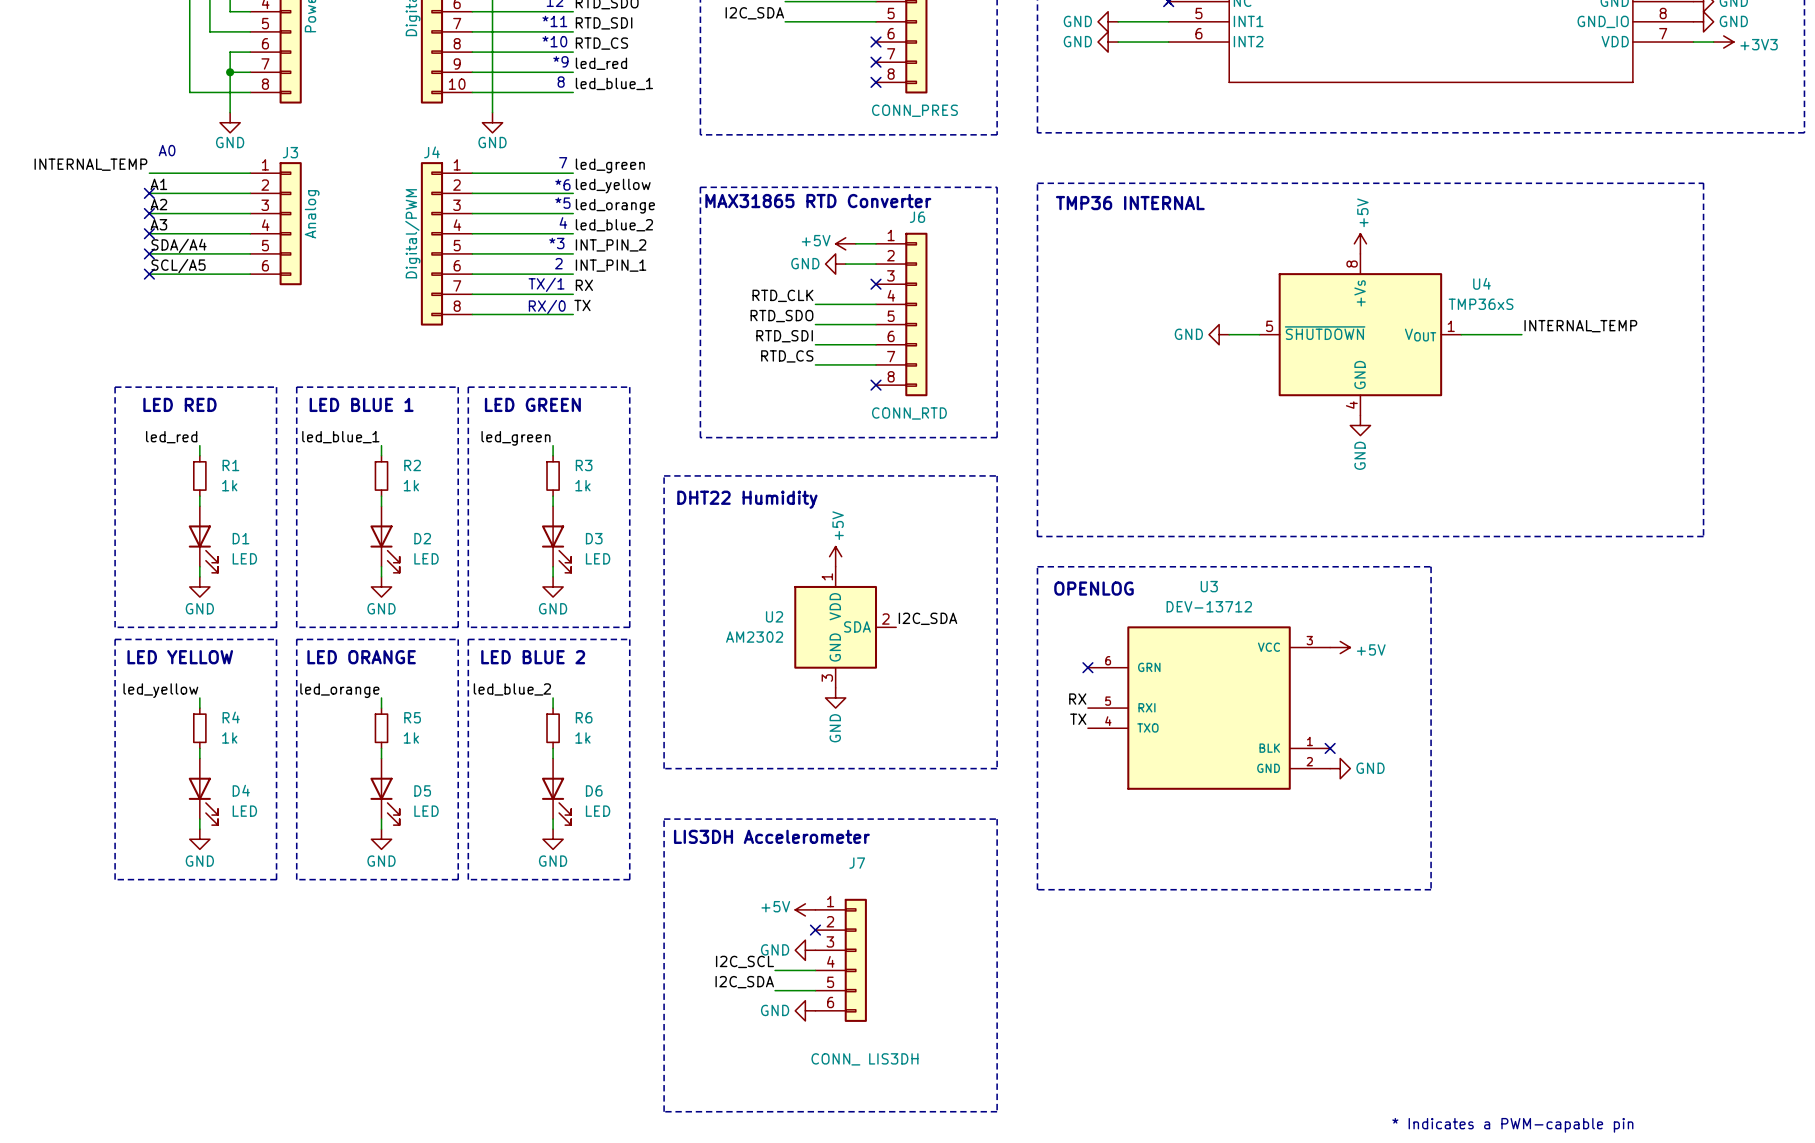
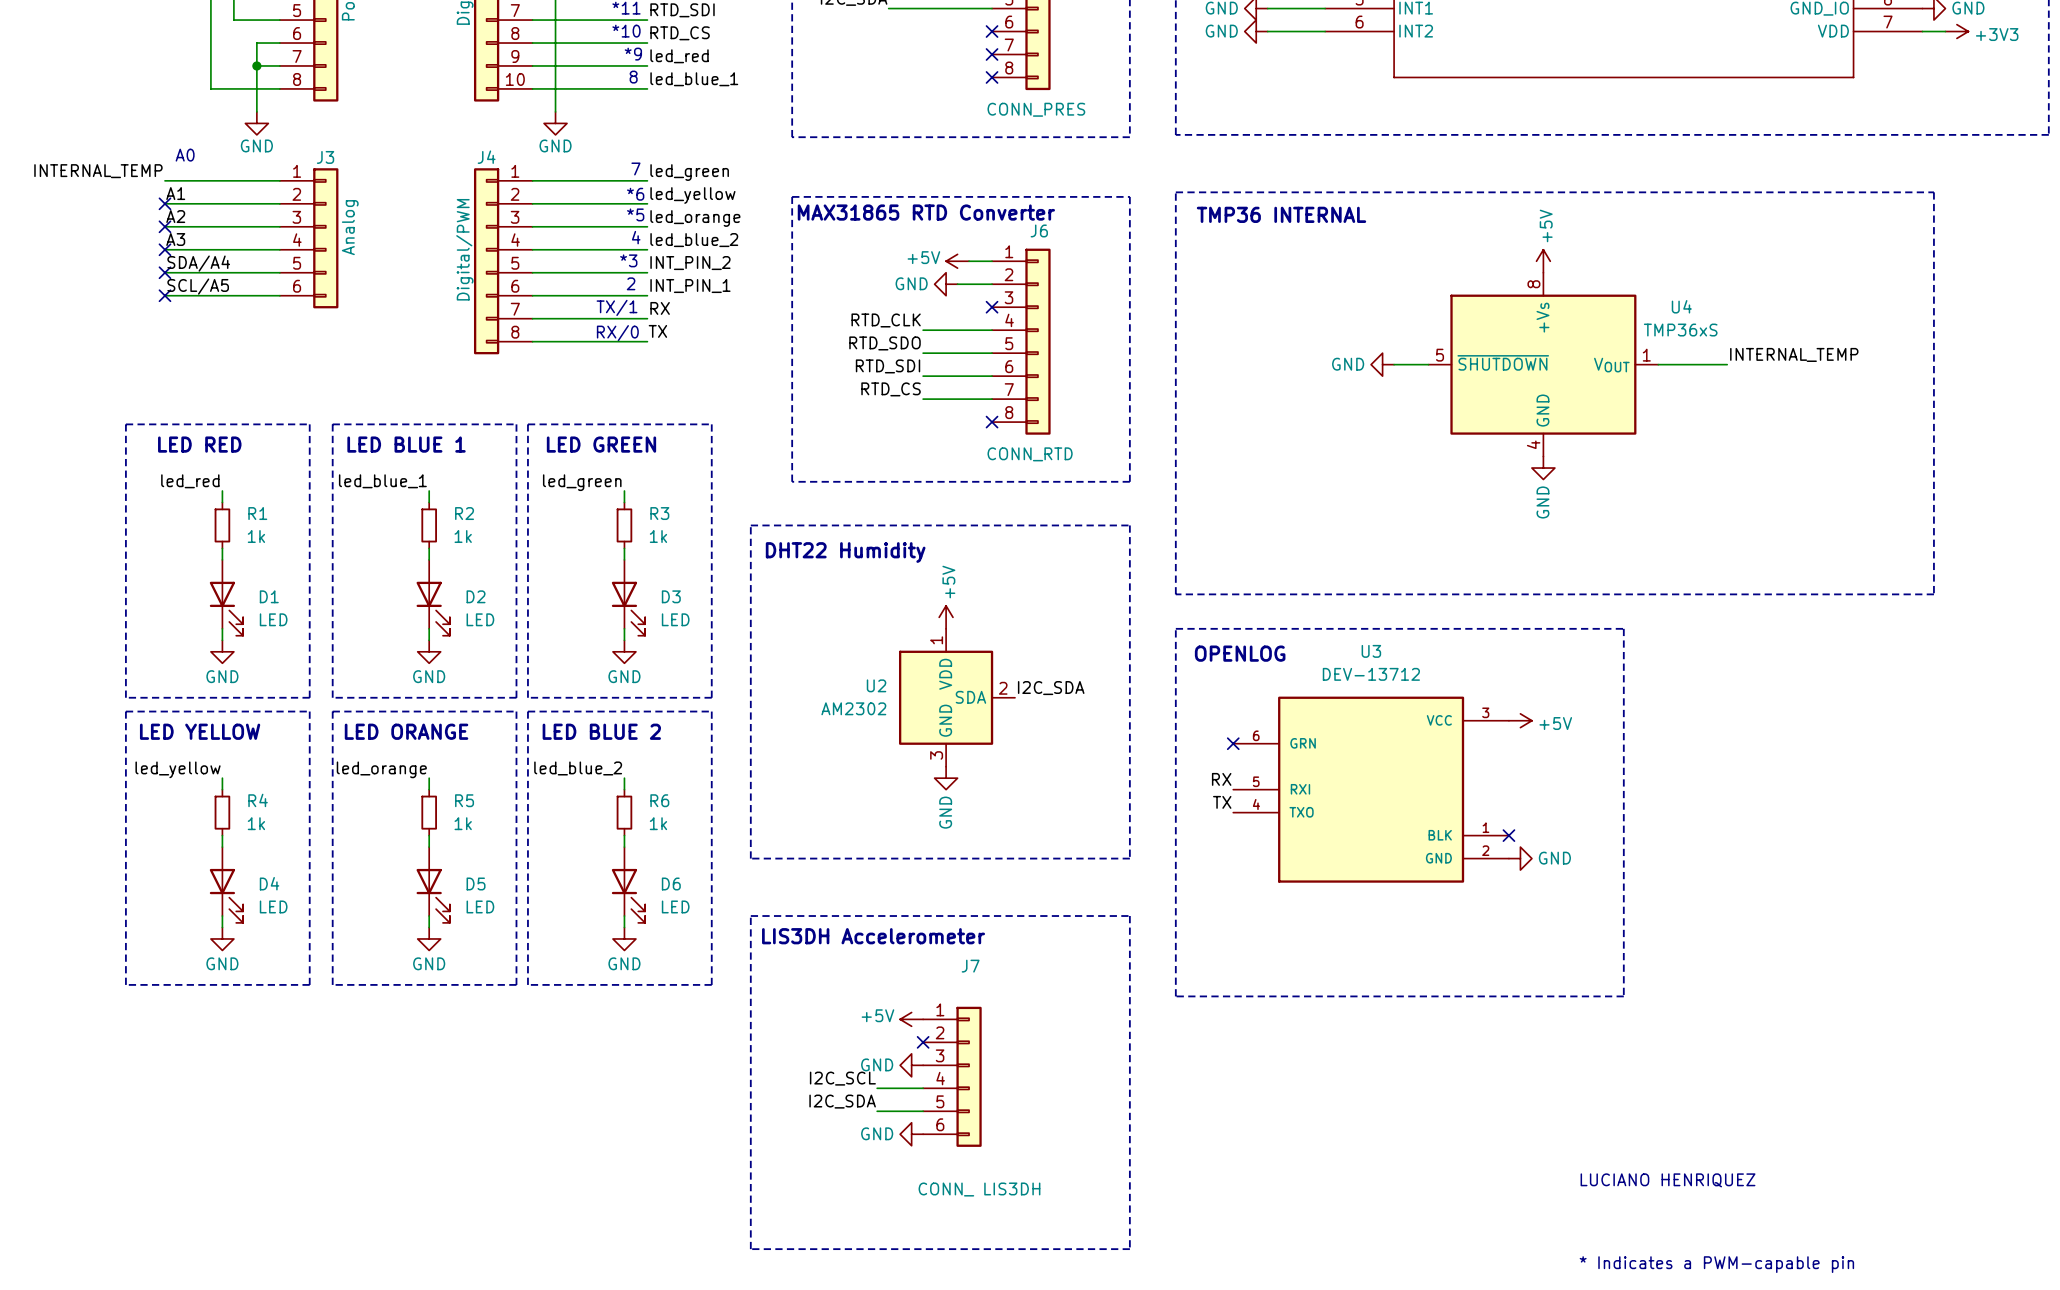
text: none -> LUCIANO HENRIQUEZ (1668, 1180)

